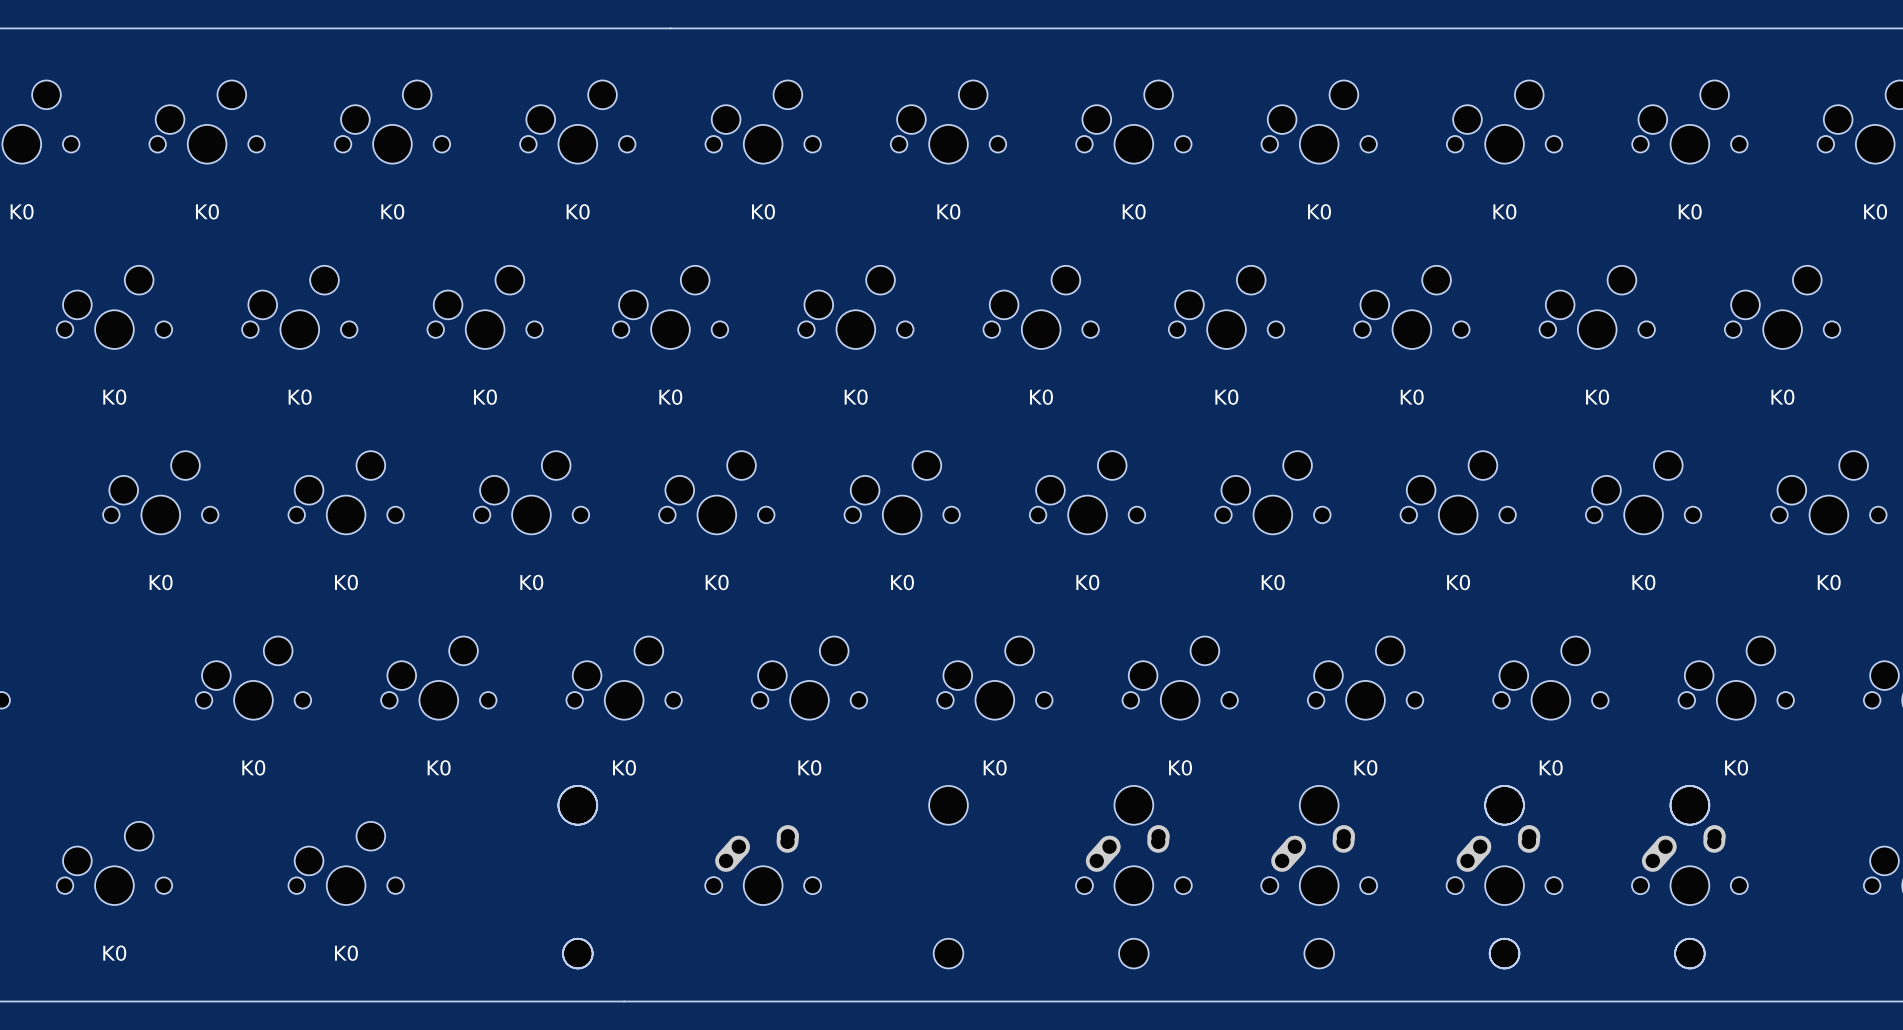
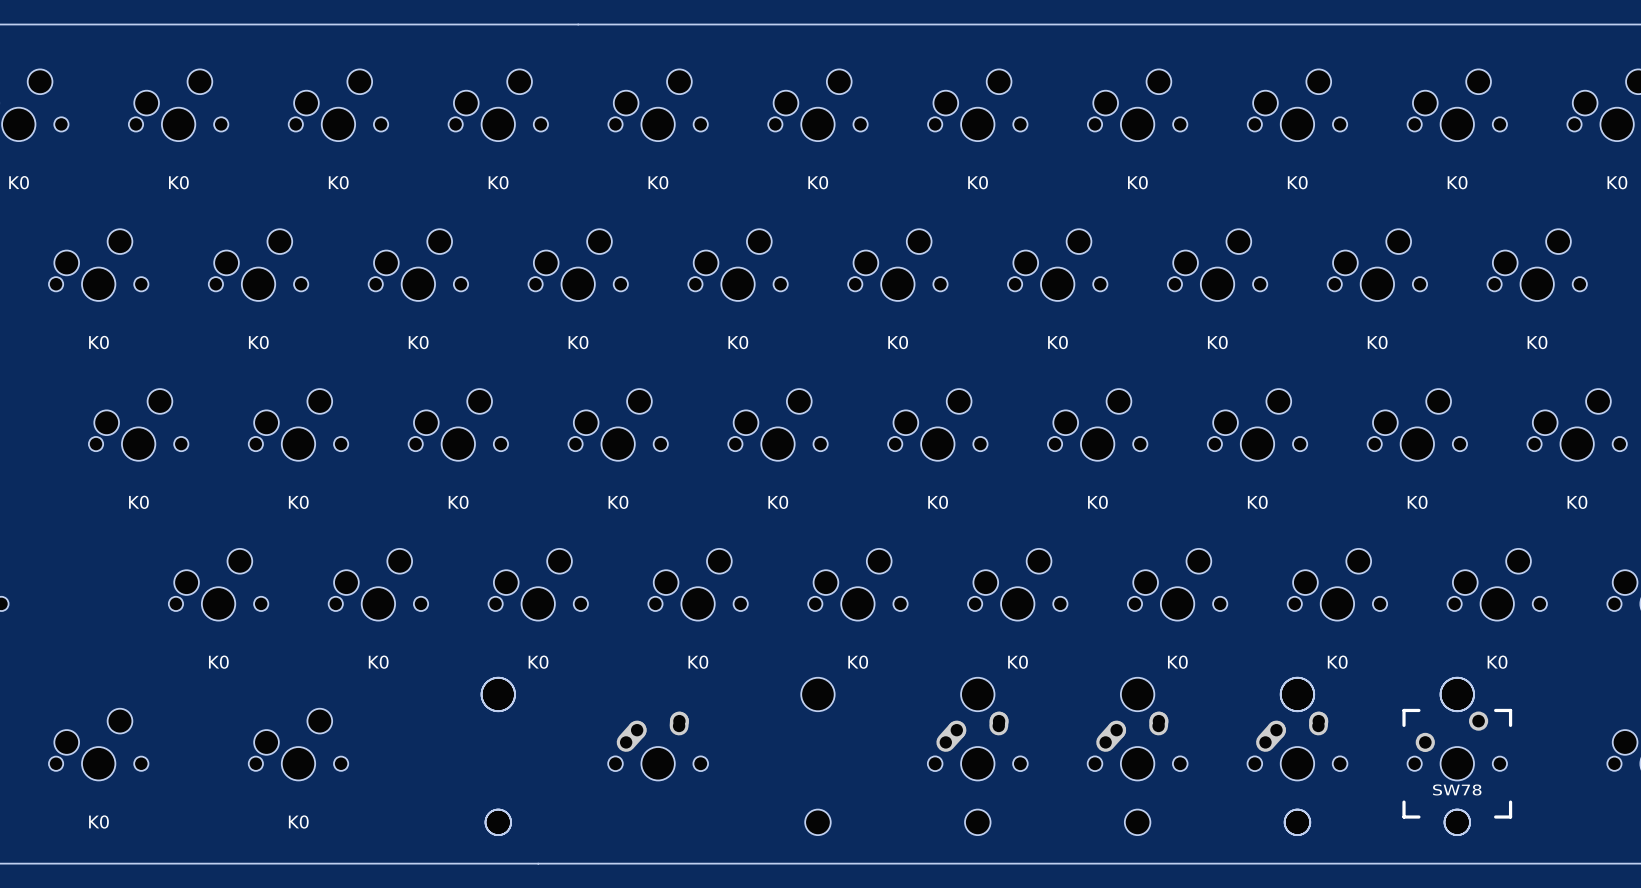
part: (1689, 865) -> none
SW78: none -> (1457, 763)

